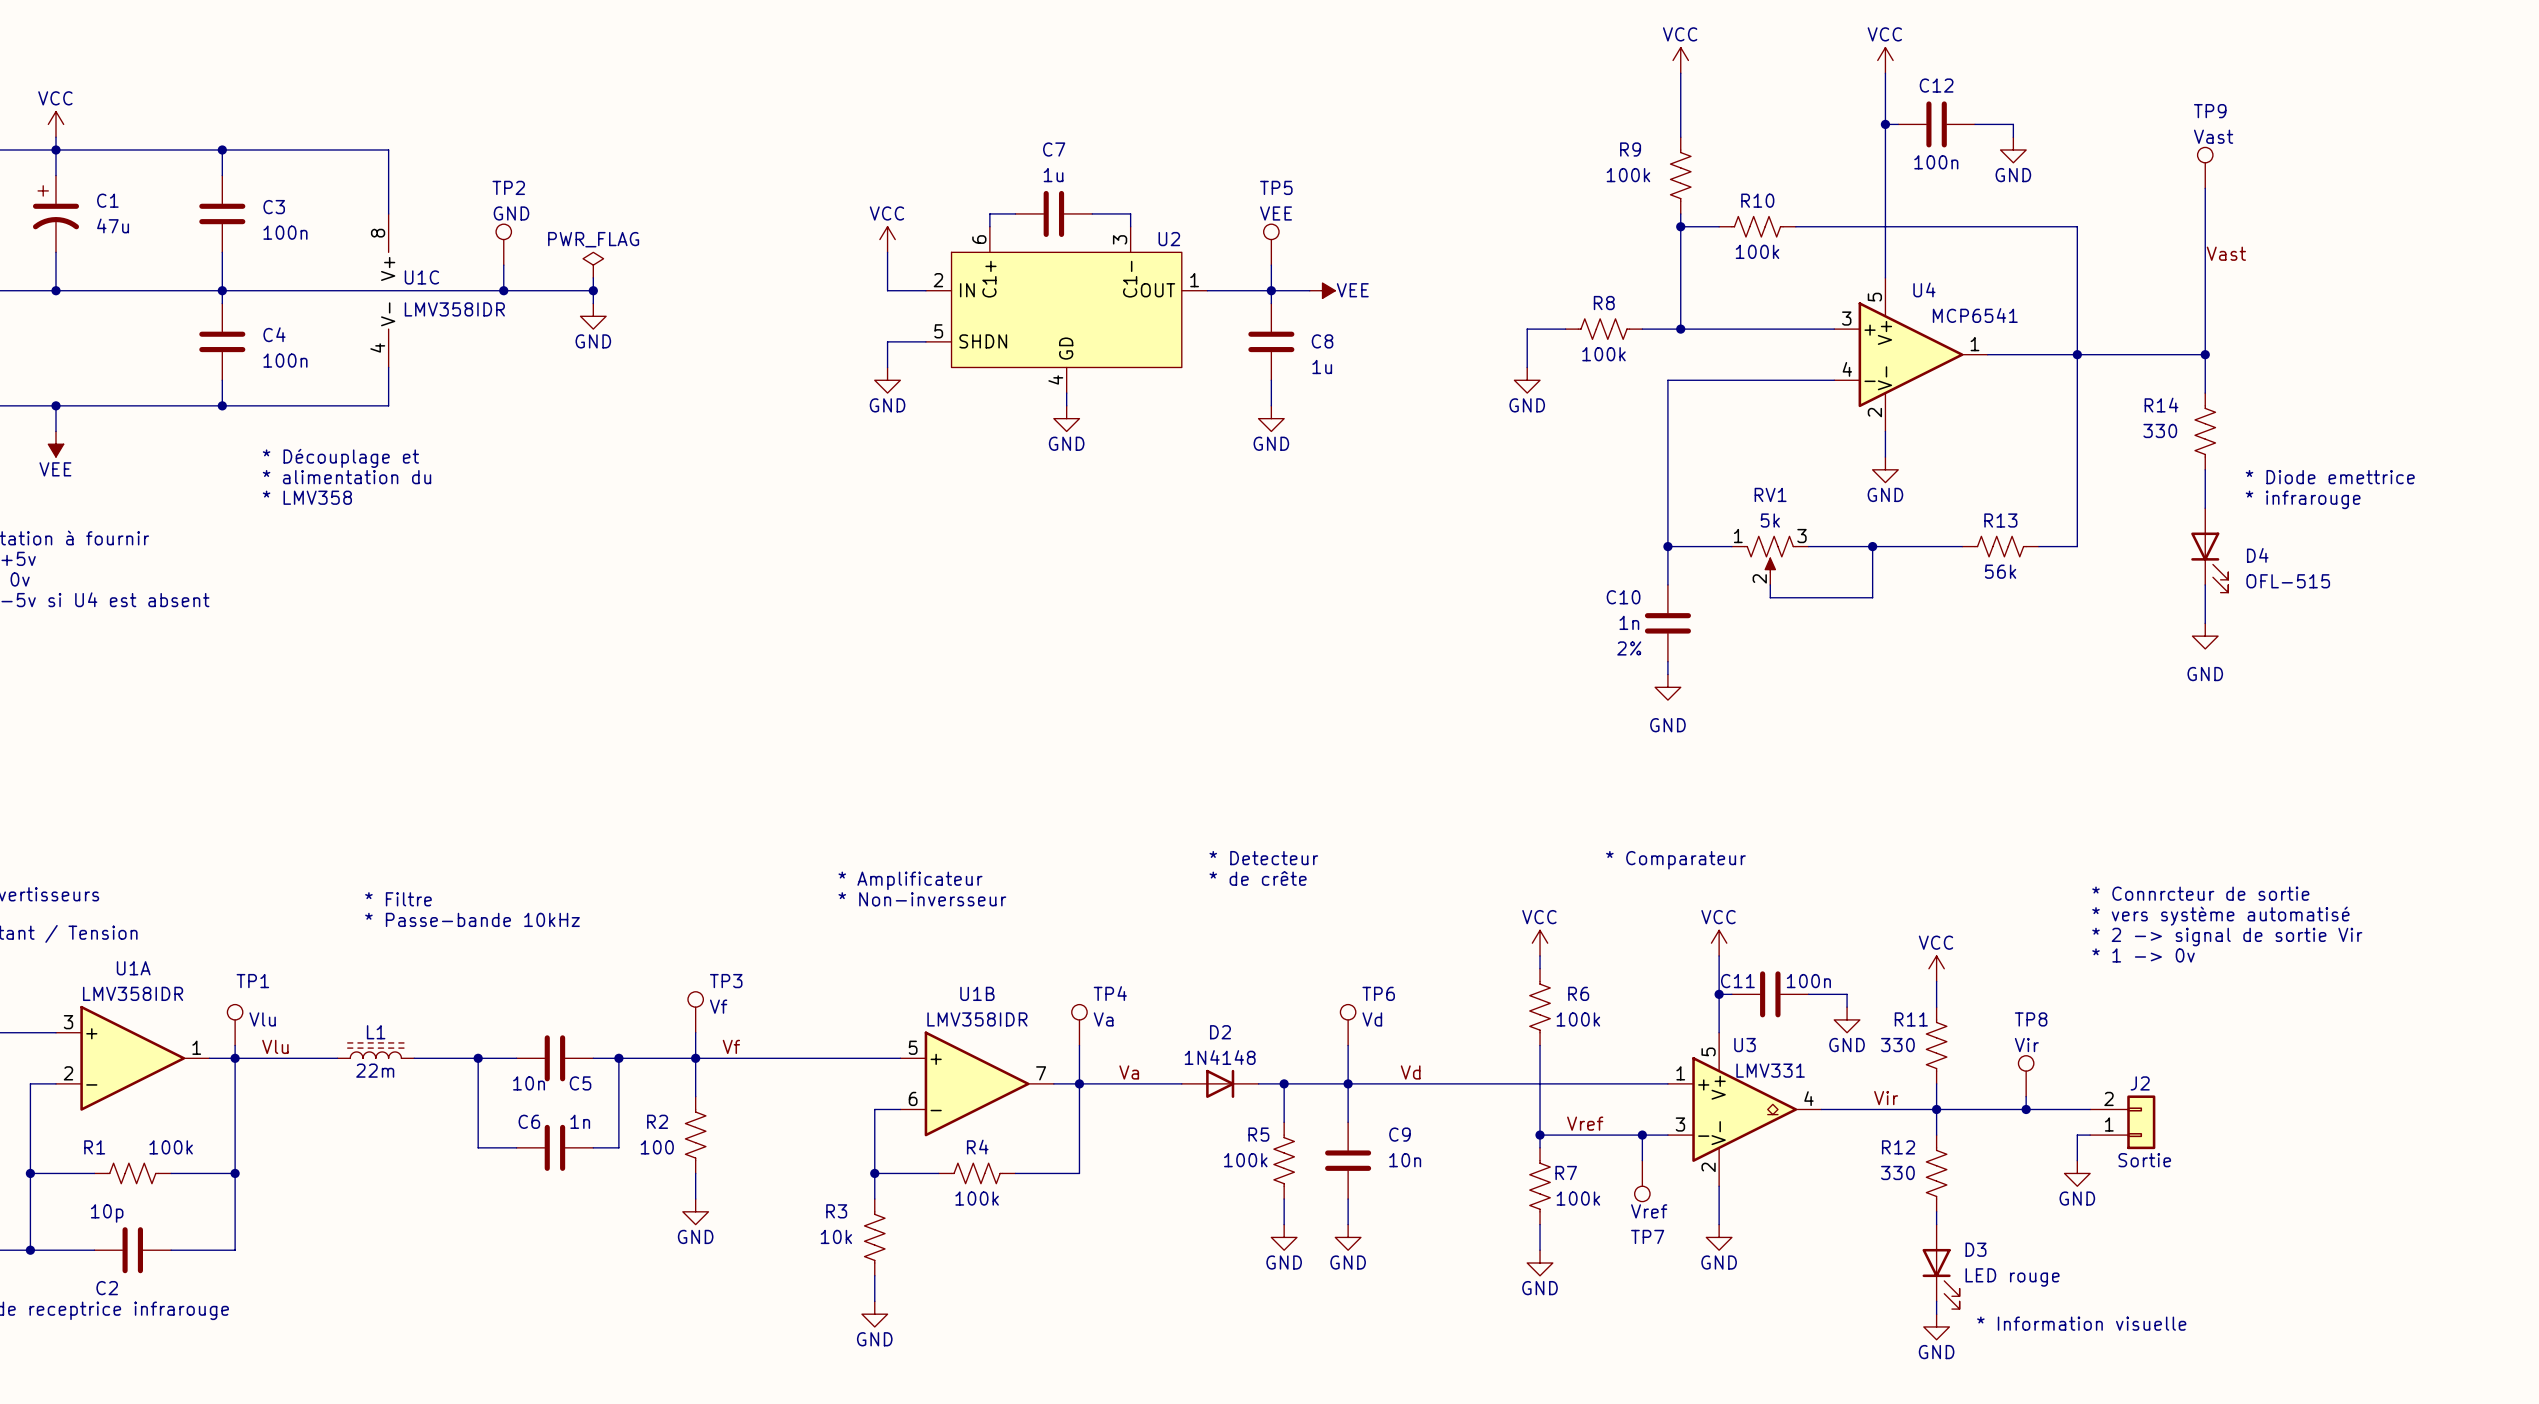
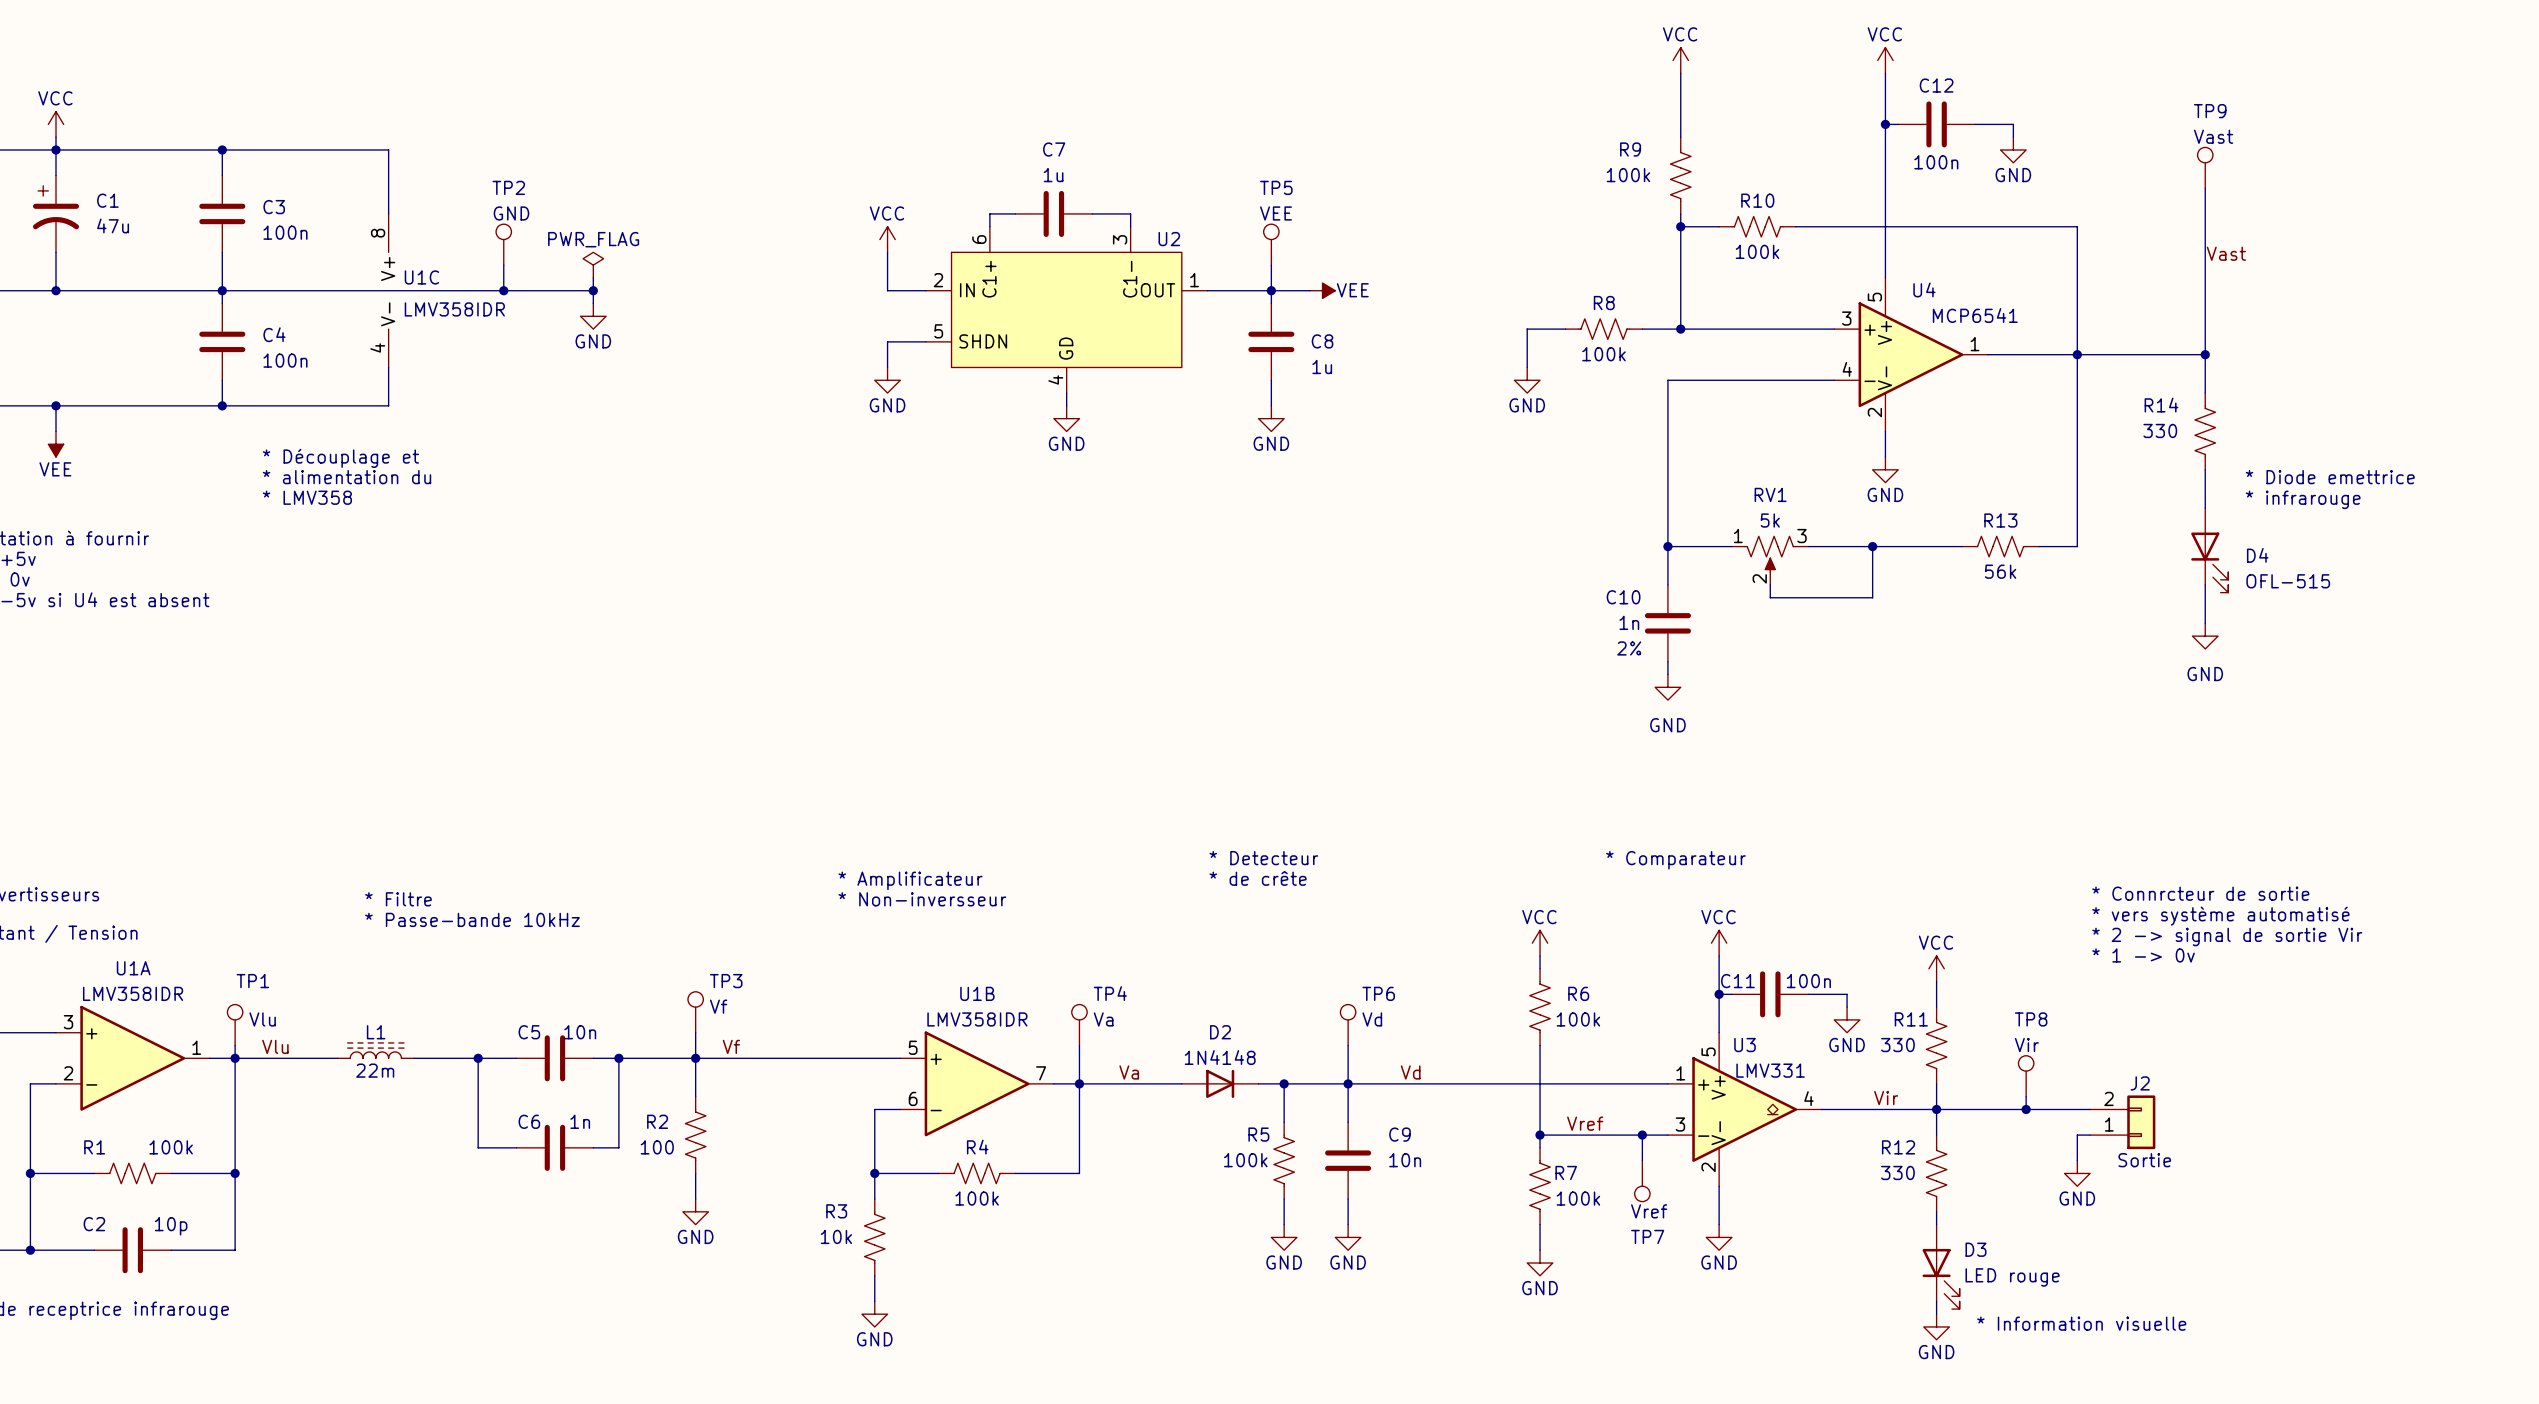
C5 value position: 10n (529, 1083) -> 10n (580, 1032)
C5 name position: C5 (580, 1083) -> C5 (529, 1032)
C2 value position: 10p (107, 1213) -> 10p (171, 1226)
C2 name position: C2 (107, 1288) -> C2 (94, 1224)

